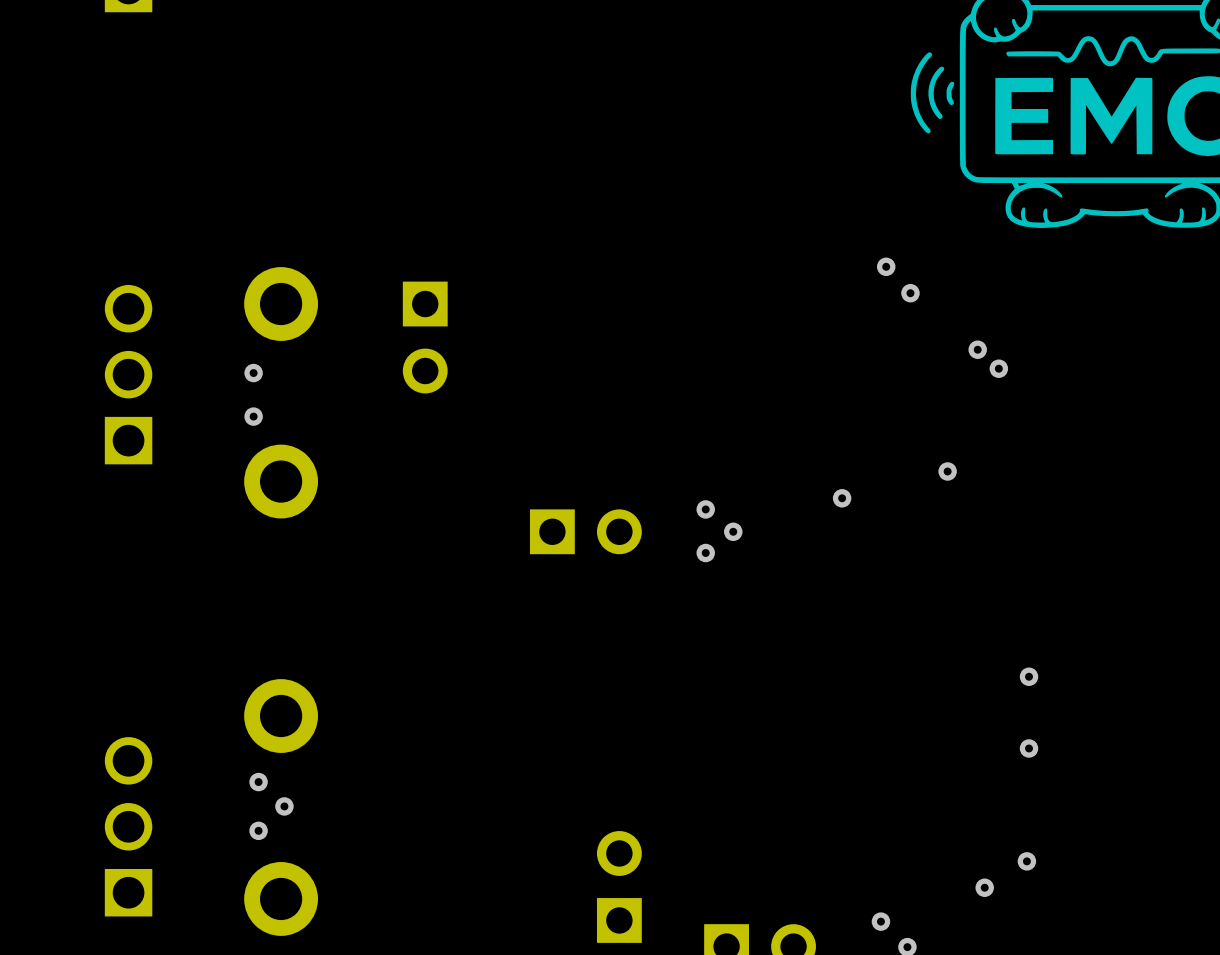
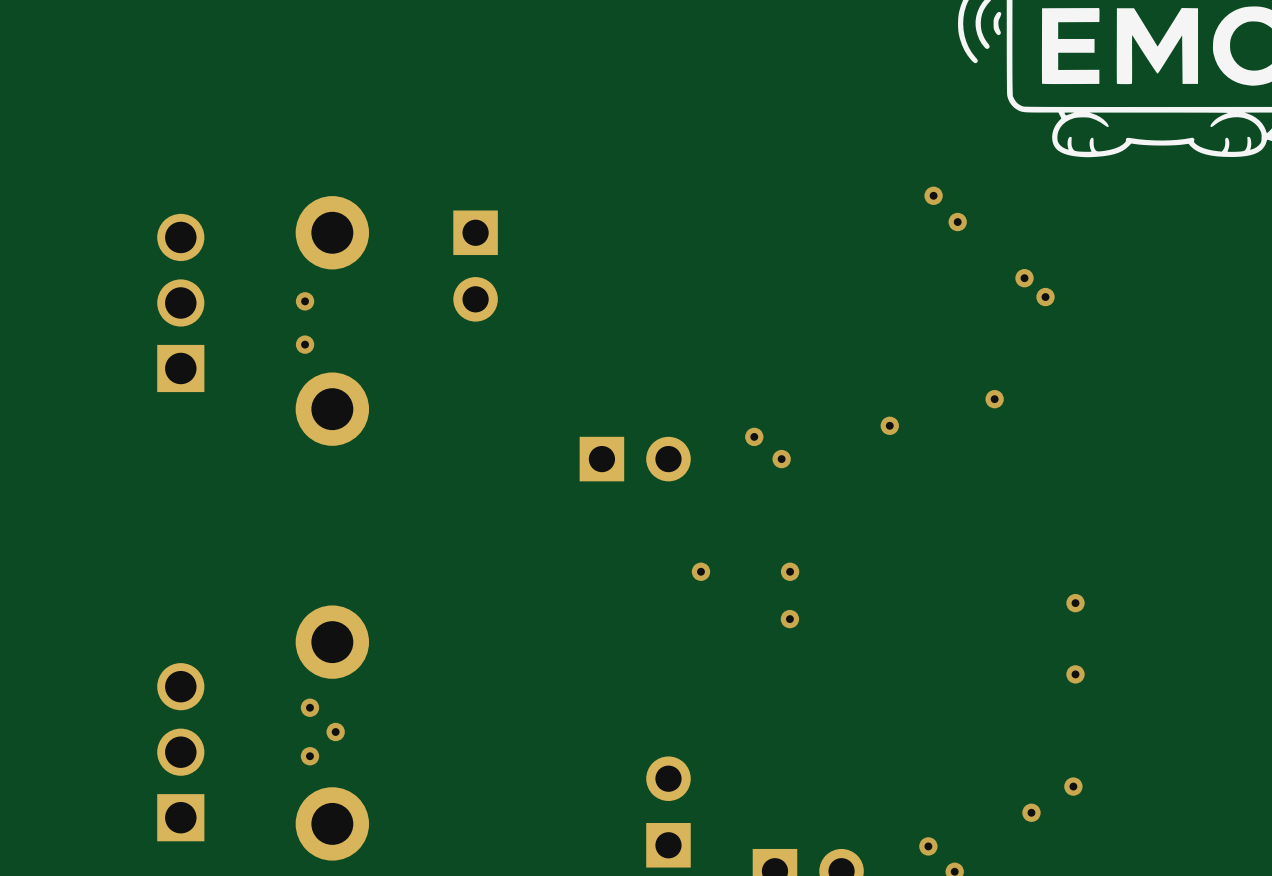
via: (705, 553) -> none
via: none -> (700, 571)
via: none -> (790, 571)
via: none -> (789, 619)

